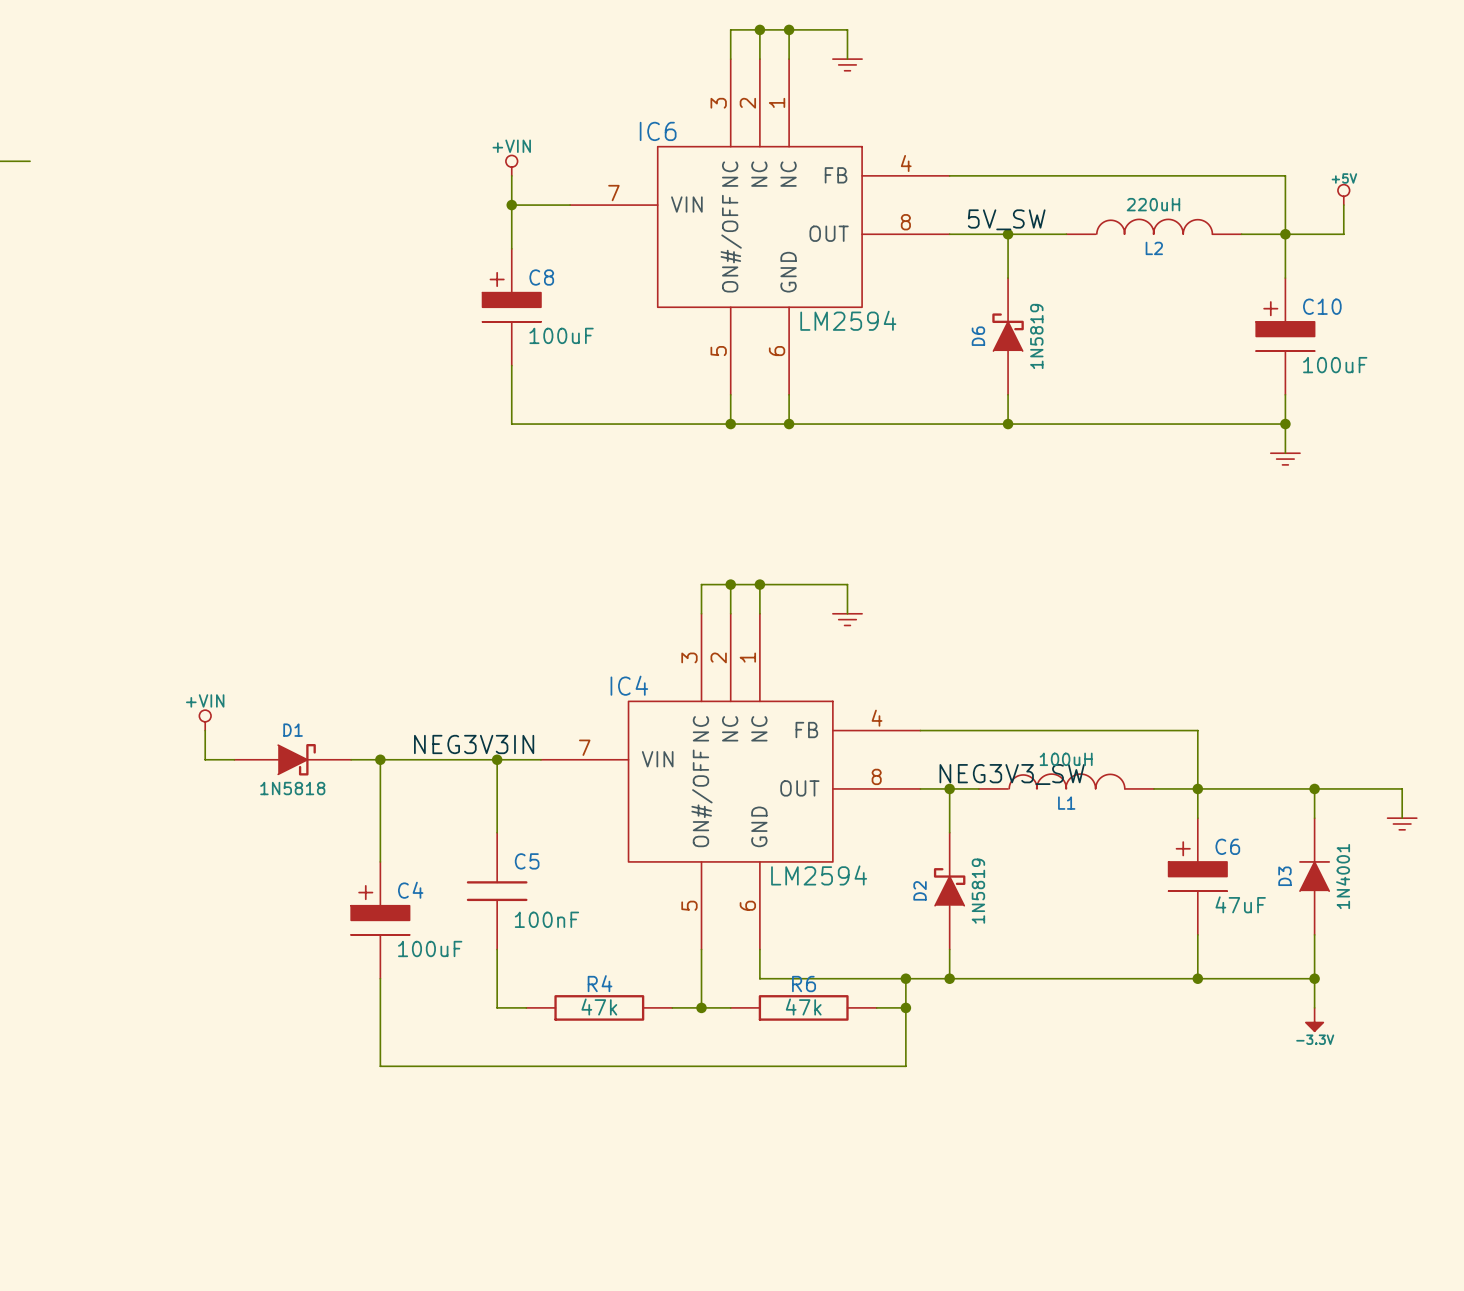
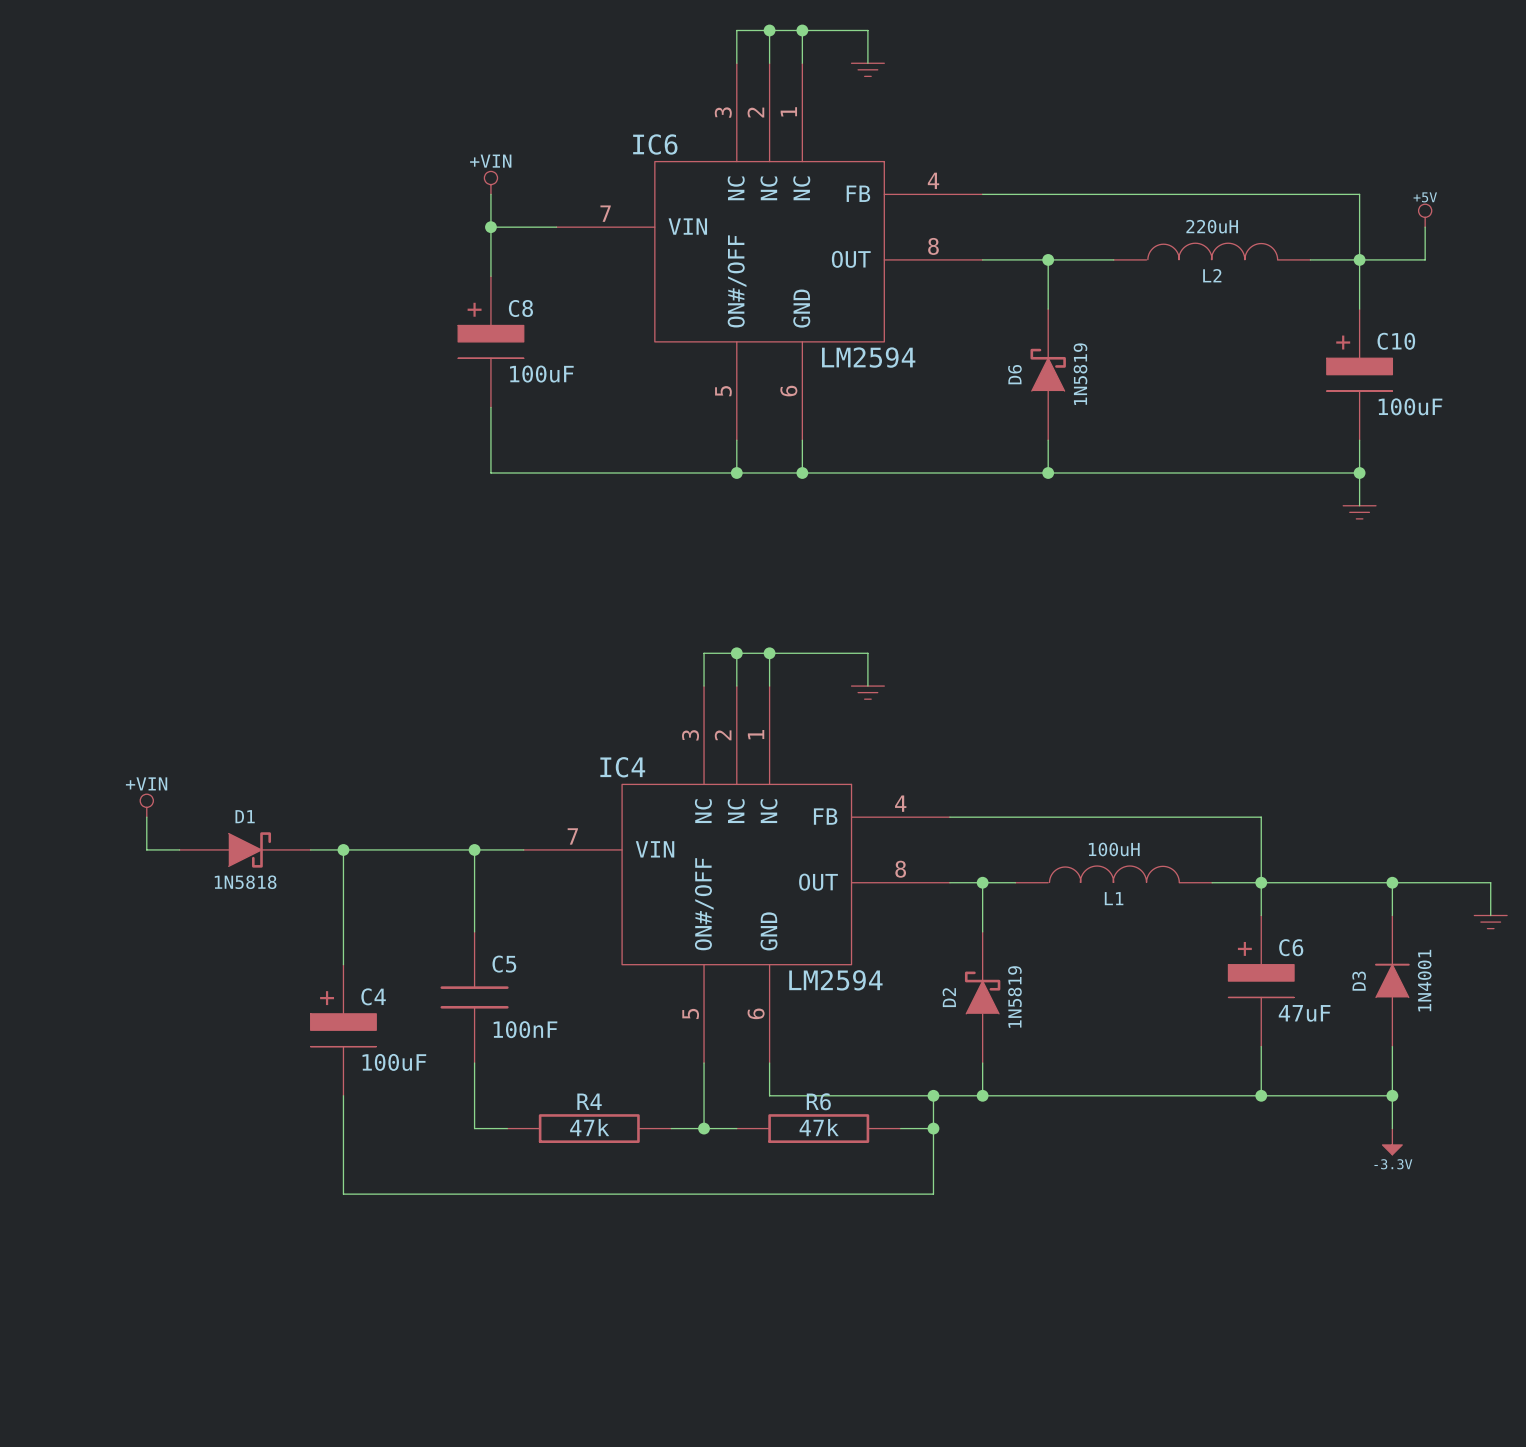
label: 5V_SW (1006, 219) -> none
label: NEG3V3IN (474, 744) -> none
label: NEG3V3_SW (1012, 774) -> none

